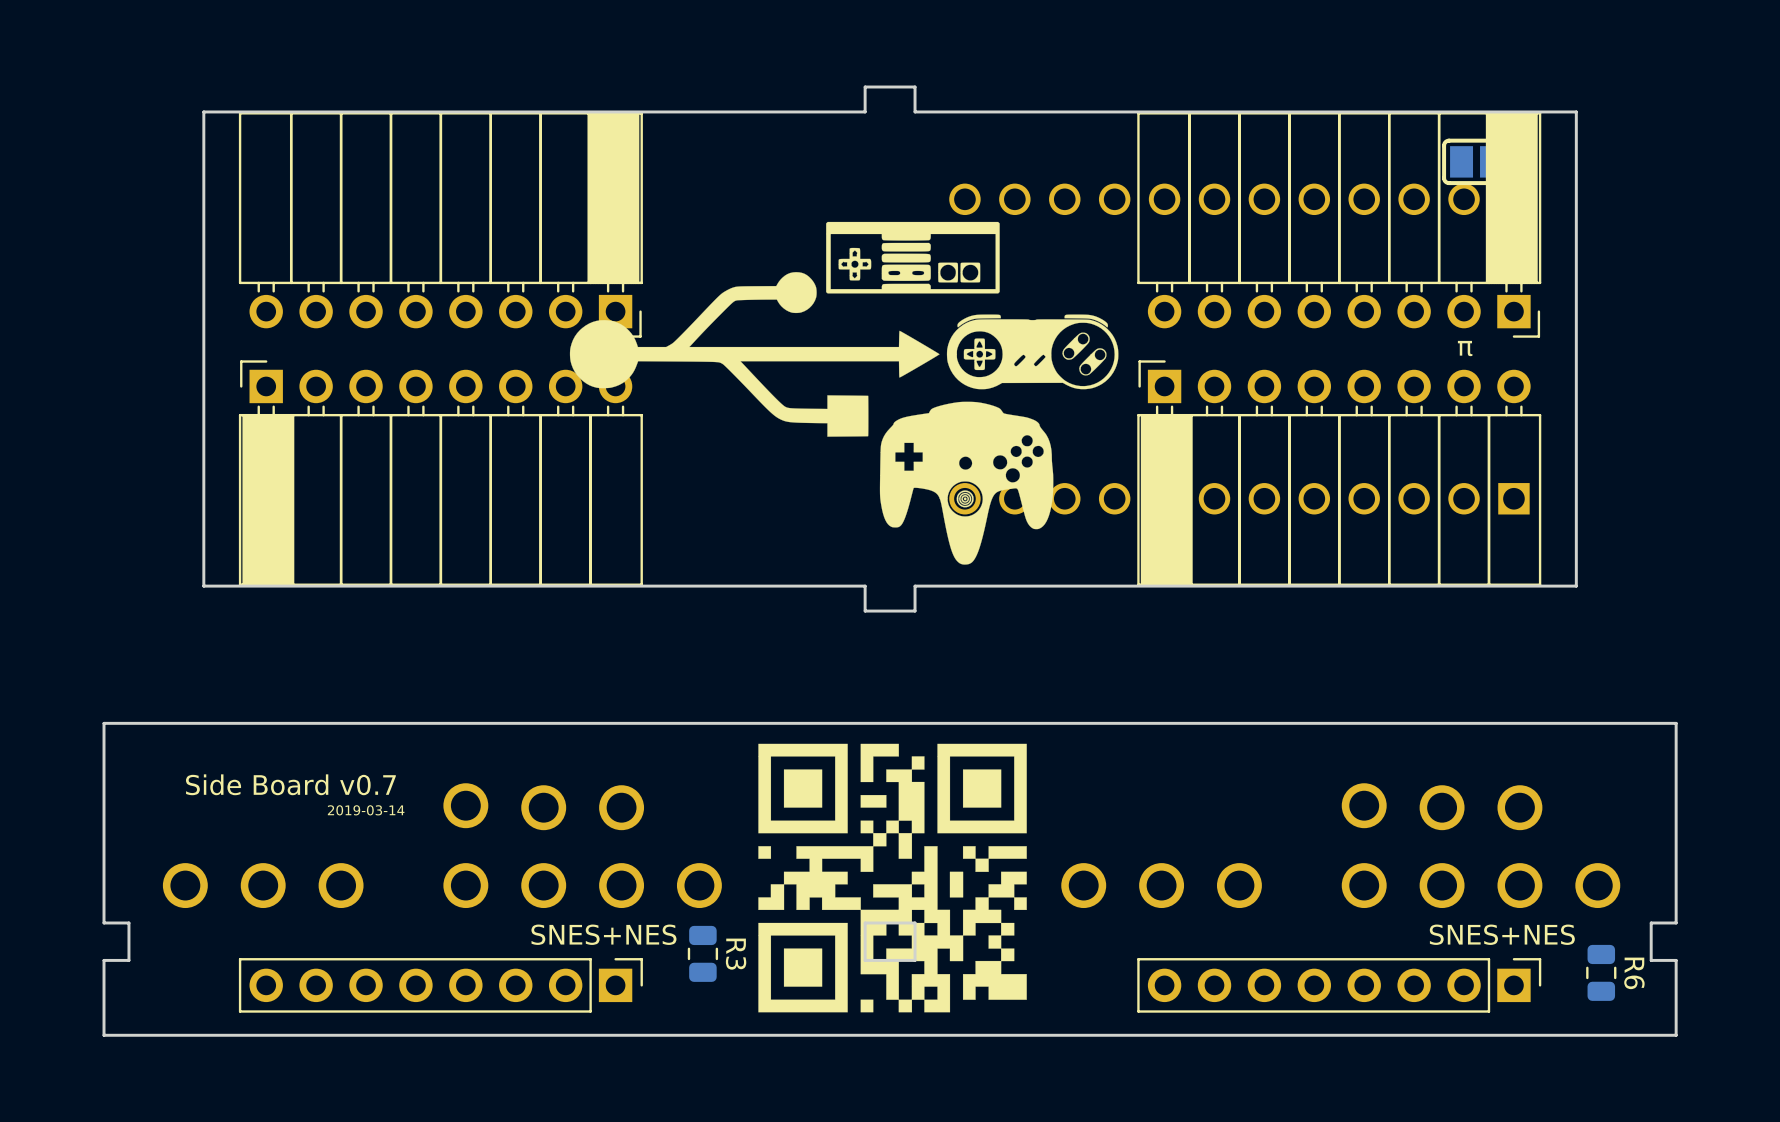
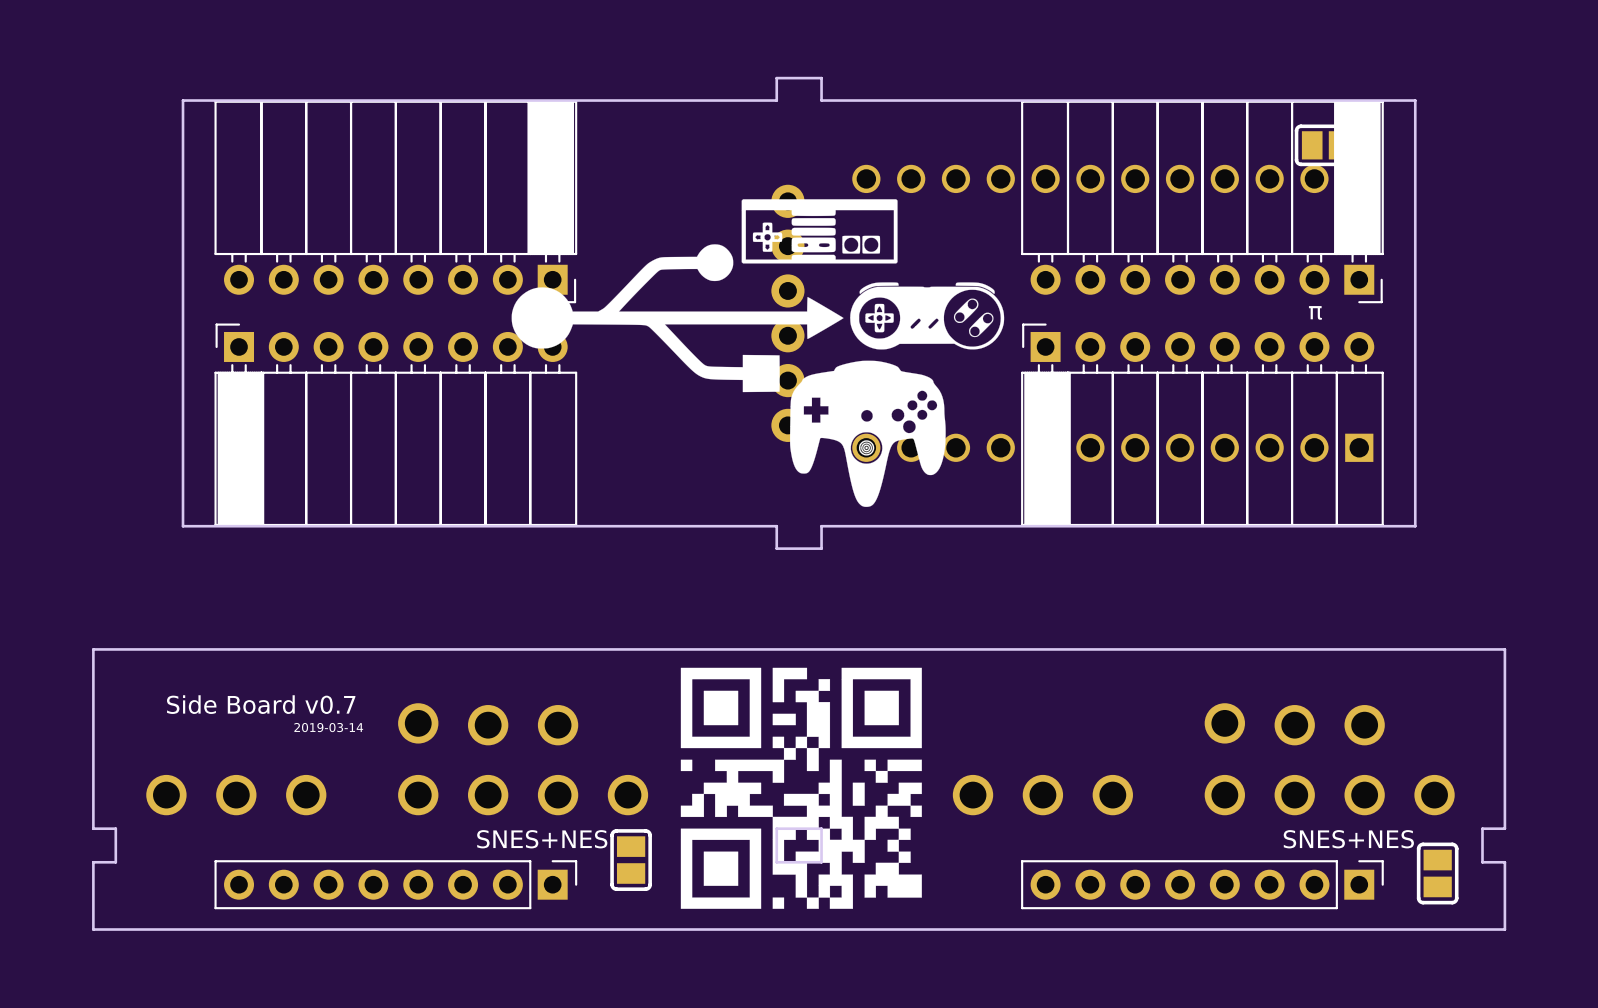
part: none -> (787, 313)
R3: (702, 953) -> none
part: none -> (631, 860)
R6: (1601, 972) -> none
part: none -> (1437, 873)

